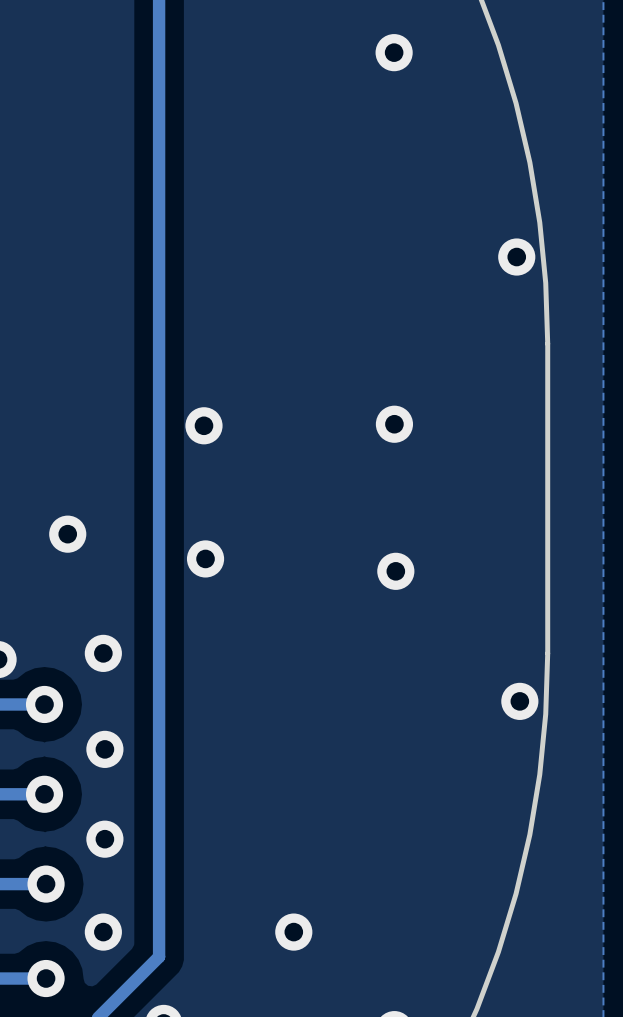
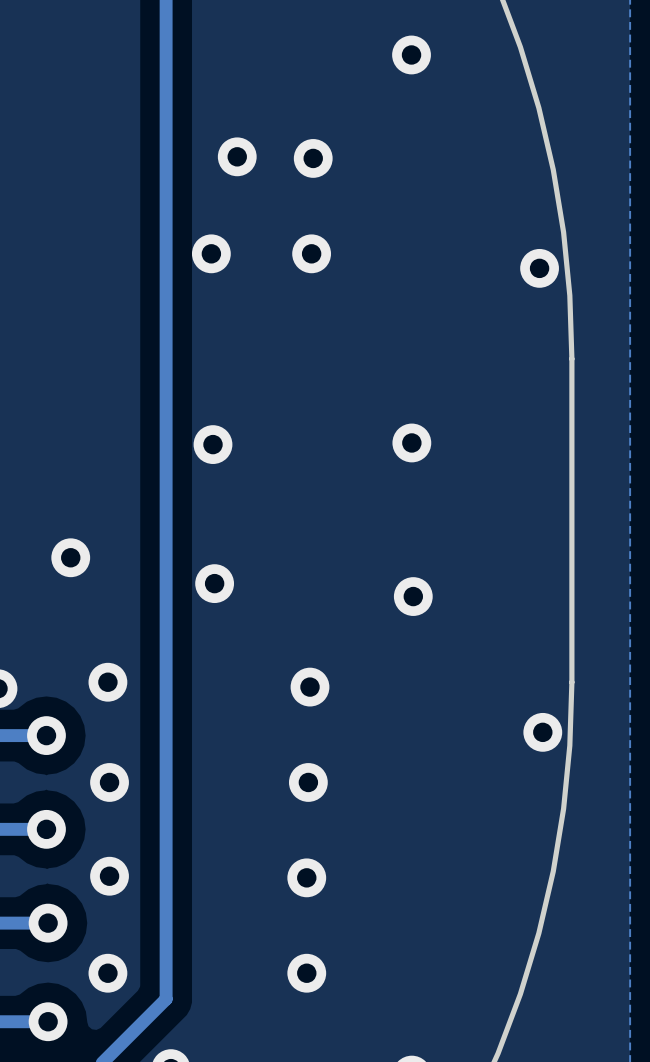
via: none -> (237, 156)
via: none -> (313, 158)
via: none -> (211, 253)
via: none -> (311, 253)
via: none -> (310, 687)
via: none -> (308, 782)
via: none -> (306, 877)

